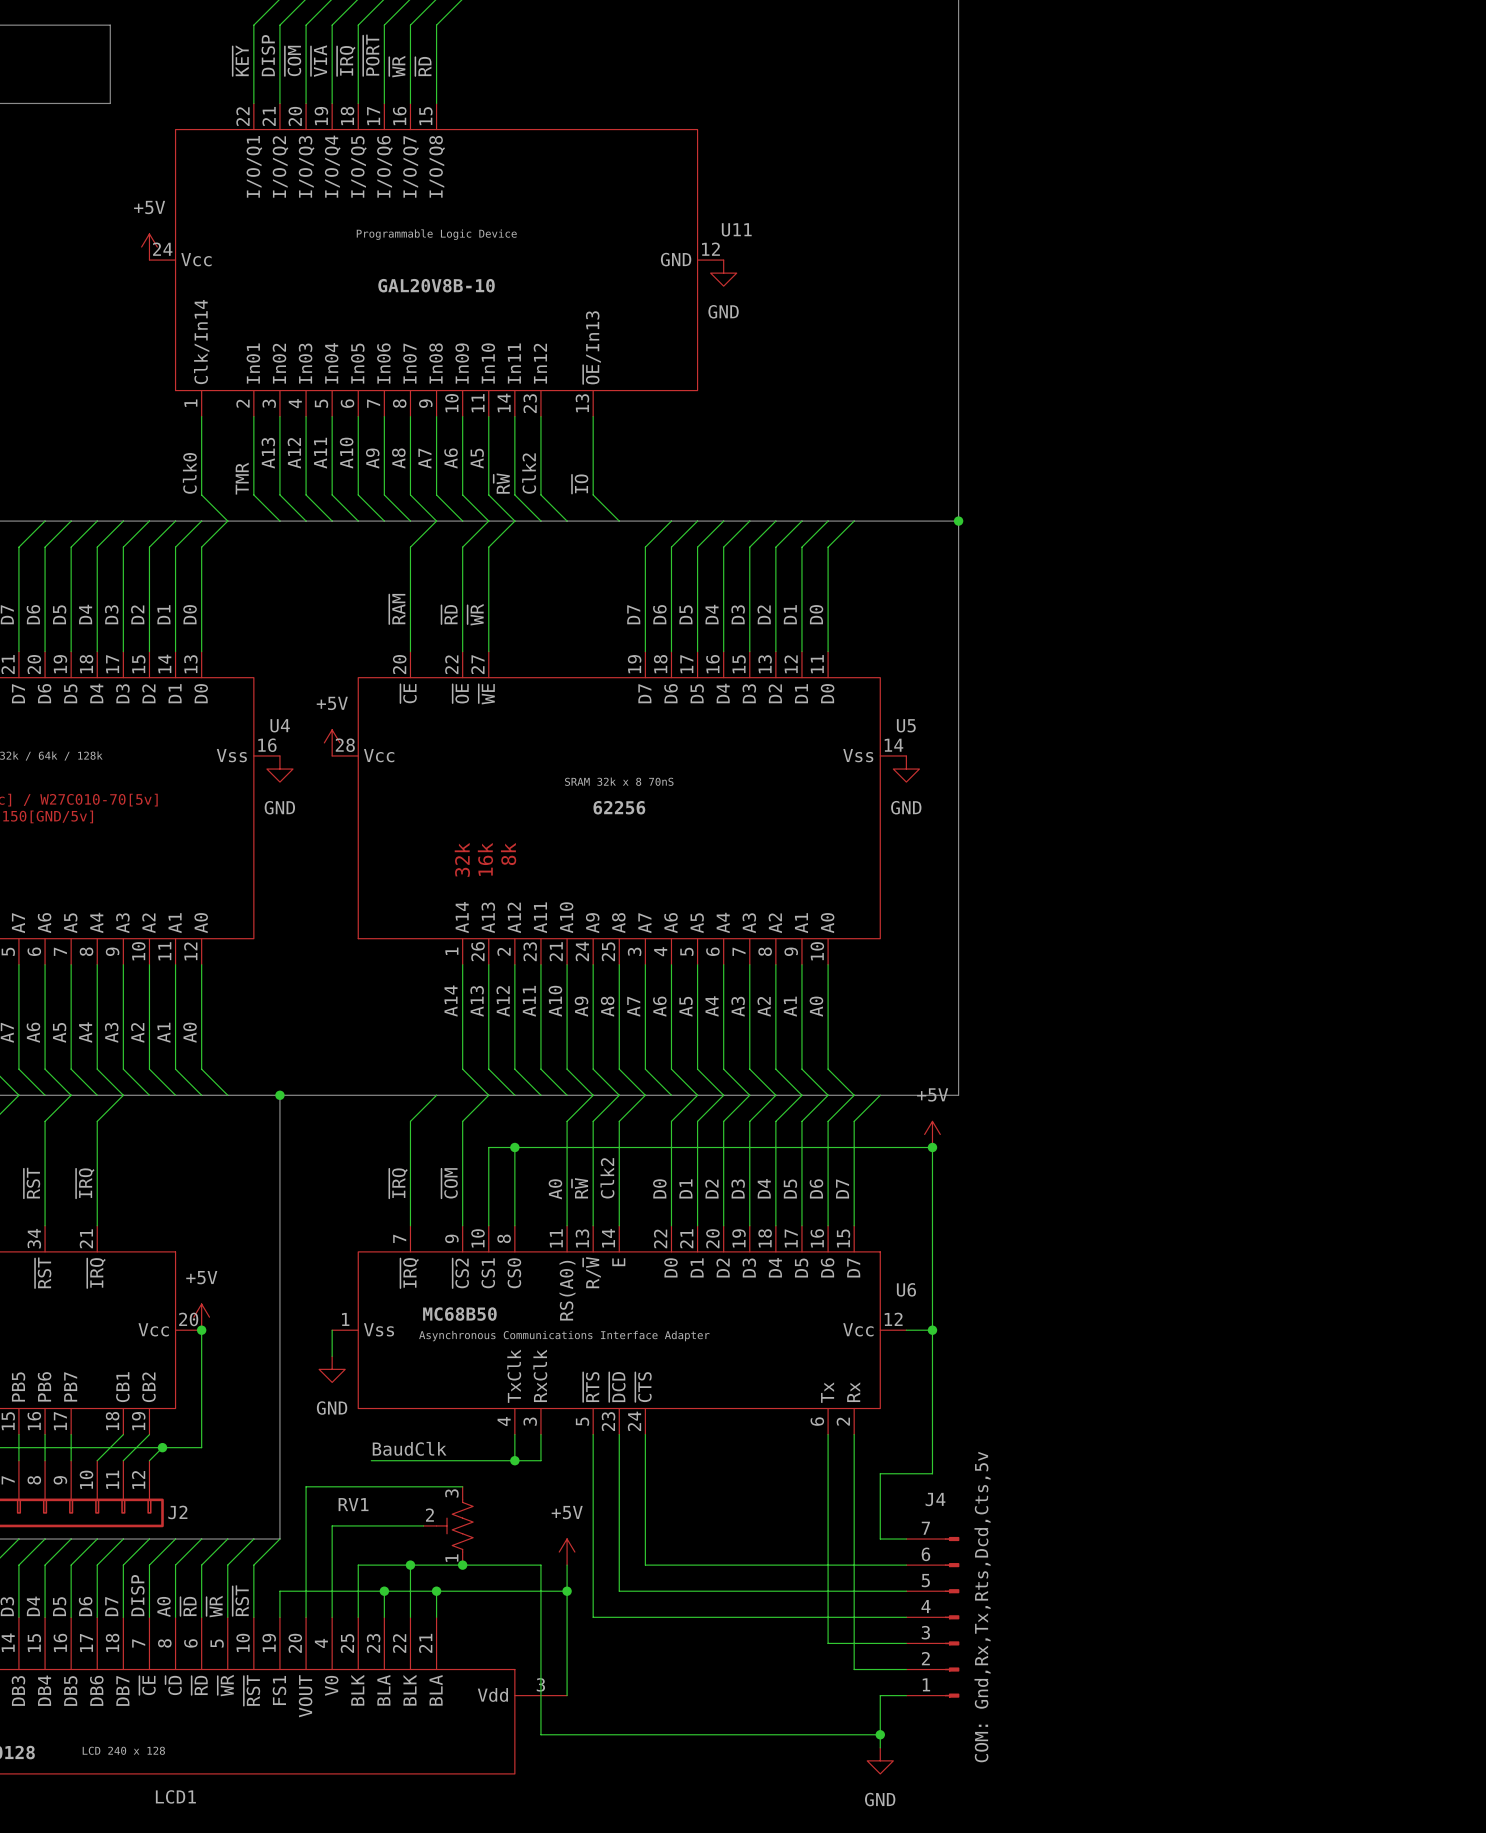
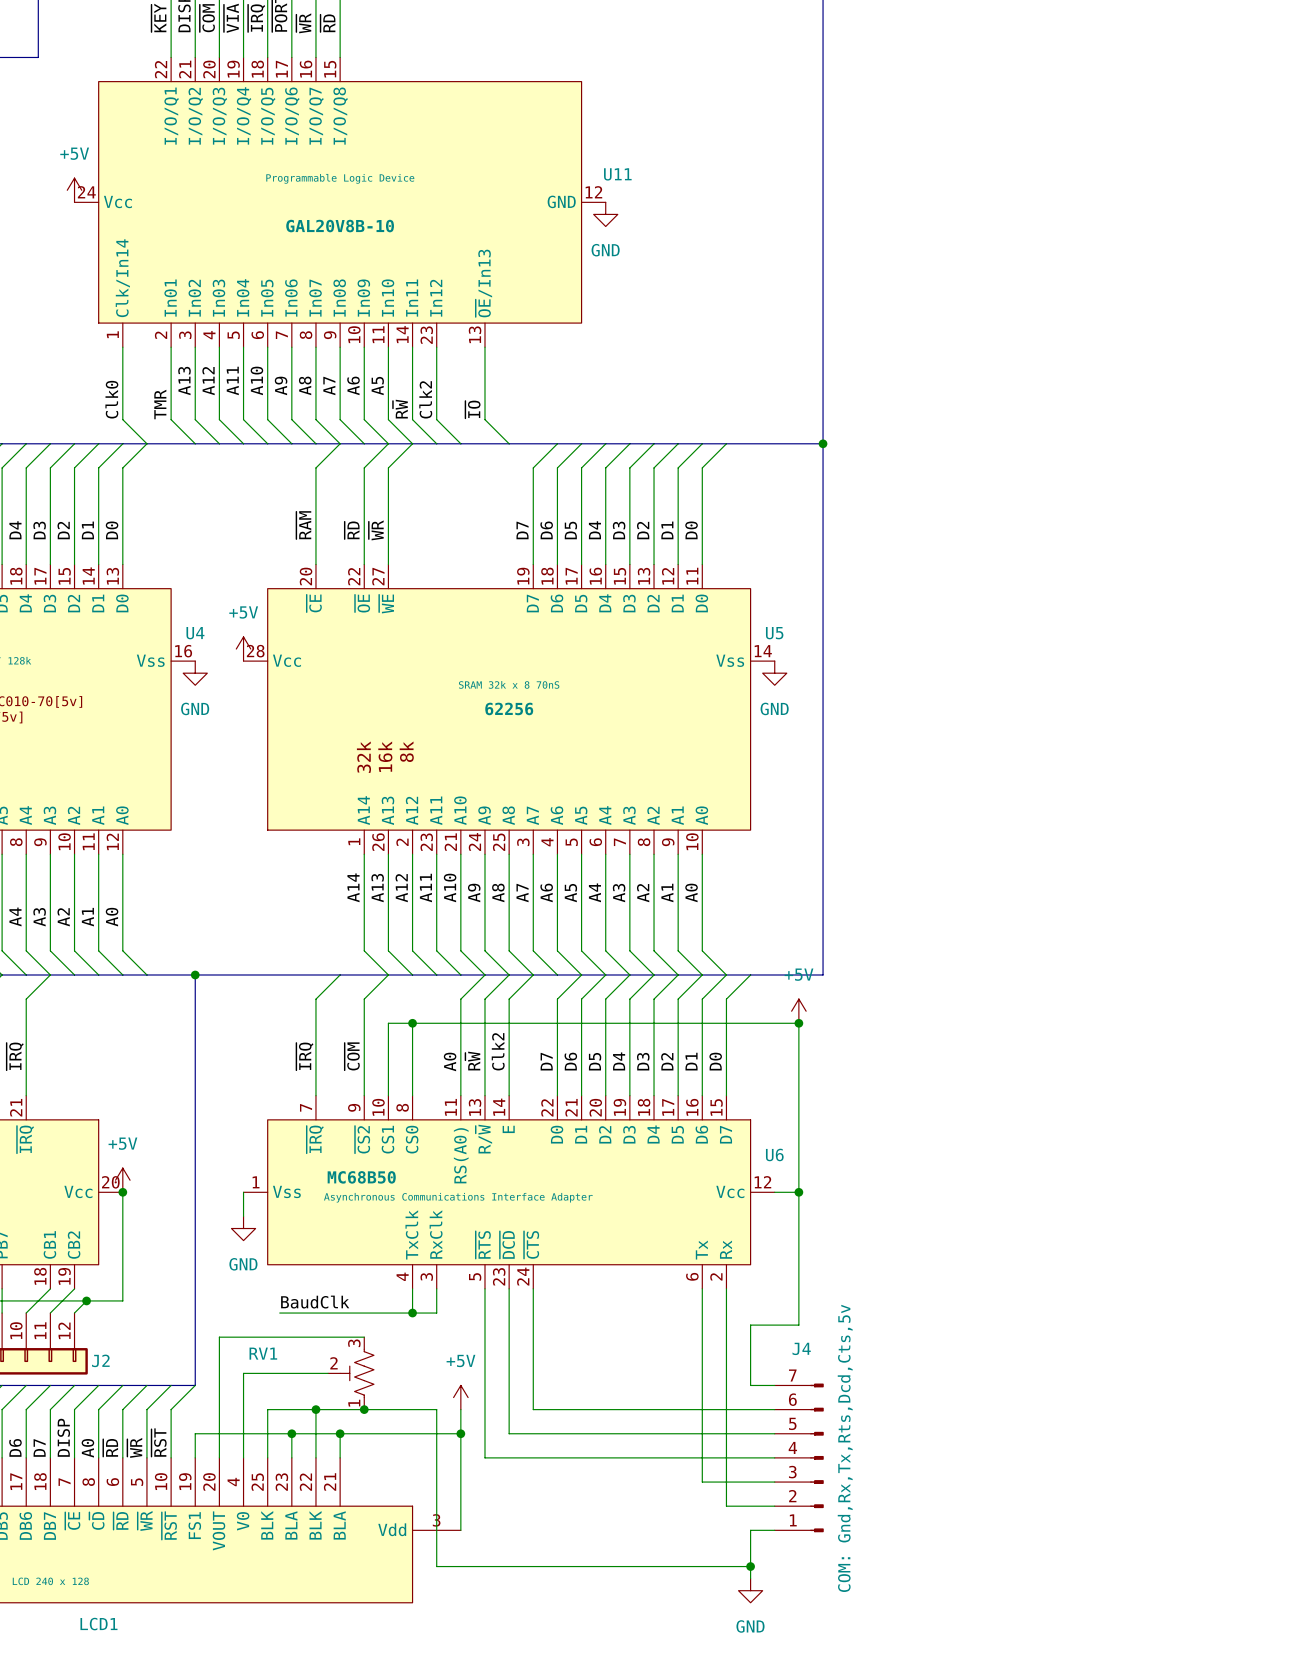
label: D0 (659, 1188) -> D7 (546, 1061)
label: D1 (685, 1188) -> D6 (570, 1061)
label: D4 (764, 1188) -> D3 (643, 1061)
label: D6 (816, 1188) -> D1 (691, 1061)
label: D2 (711, 1189) -> D5 (595, 1061)
label: D3 (738, 1189) -> D4 (619, 1061)
label: D5 (790, 1189) -> D2 (667, 1061)
label: D7 (842, 1189) -> D0 (715, 1061)

